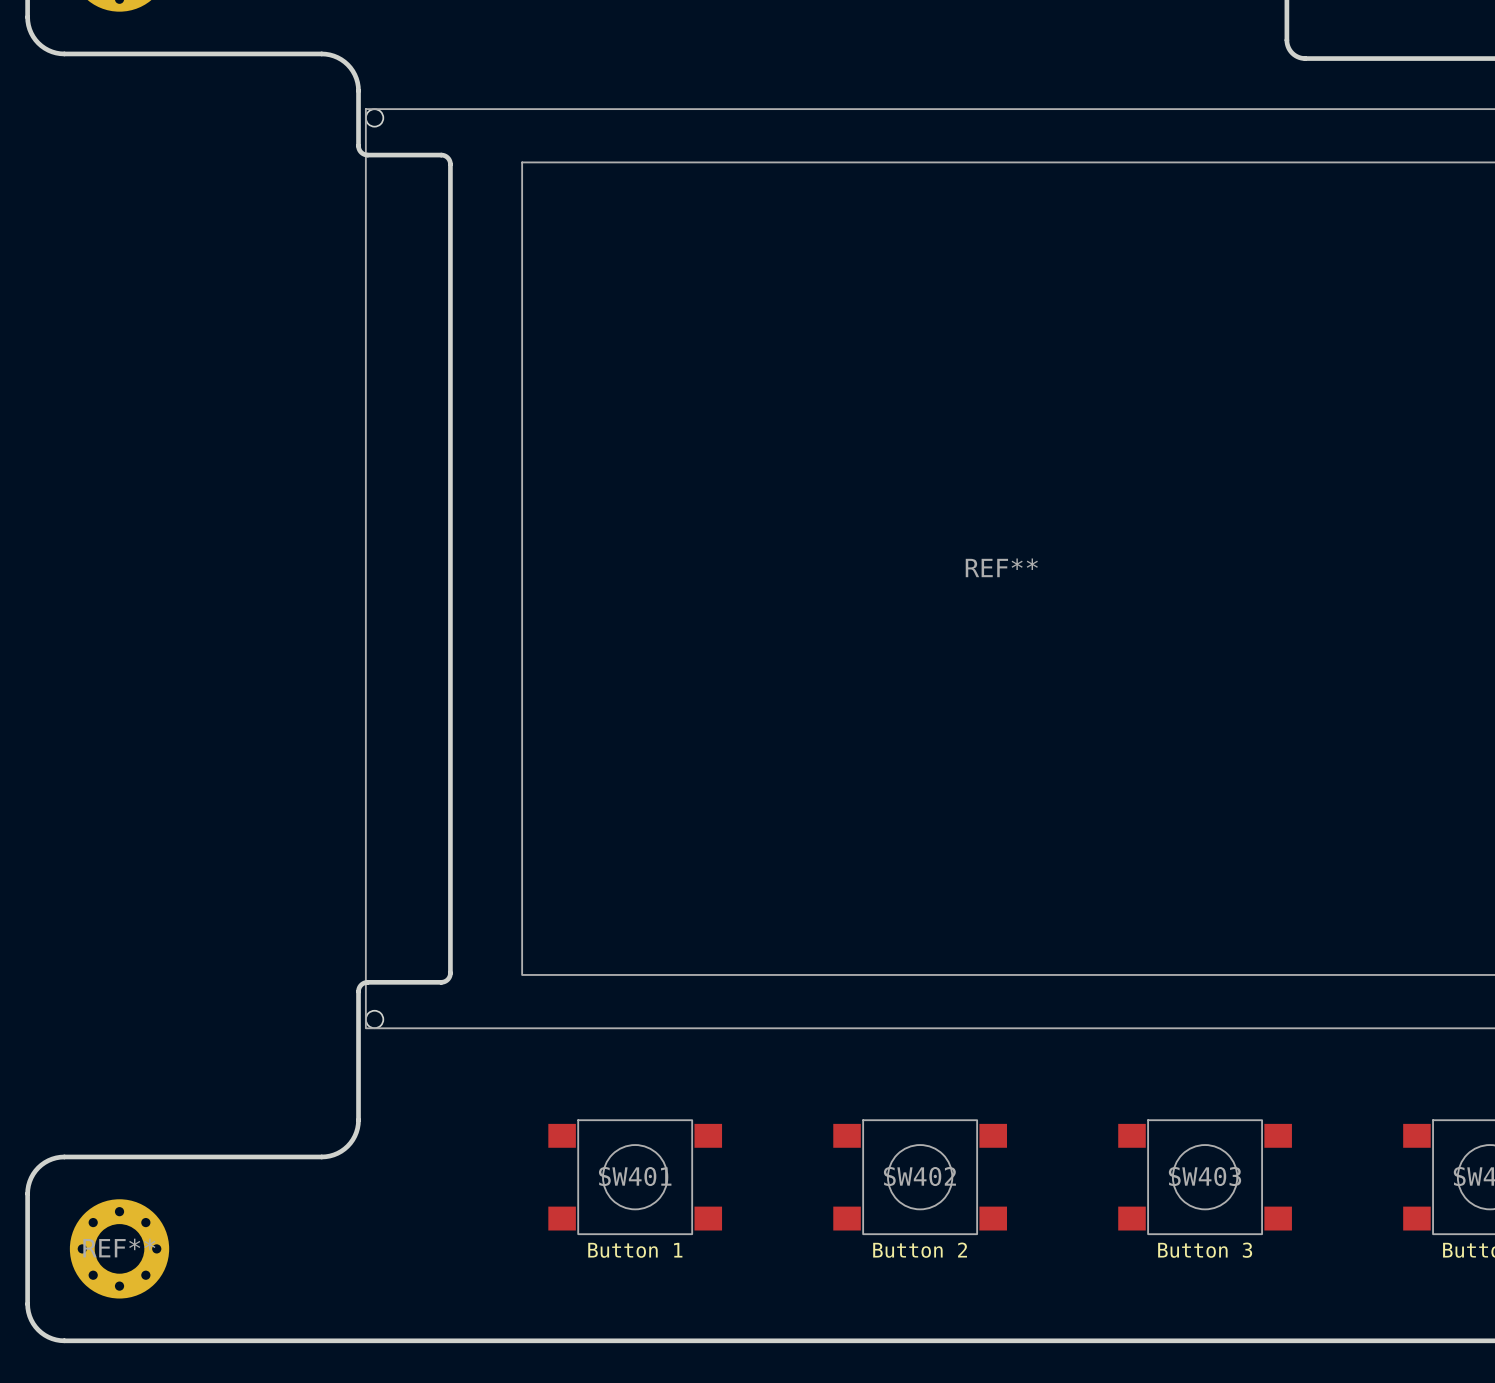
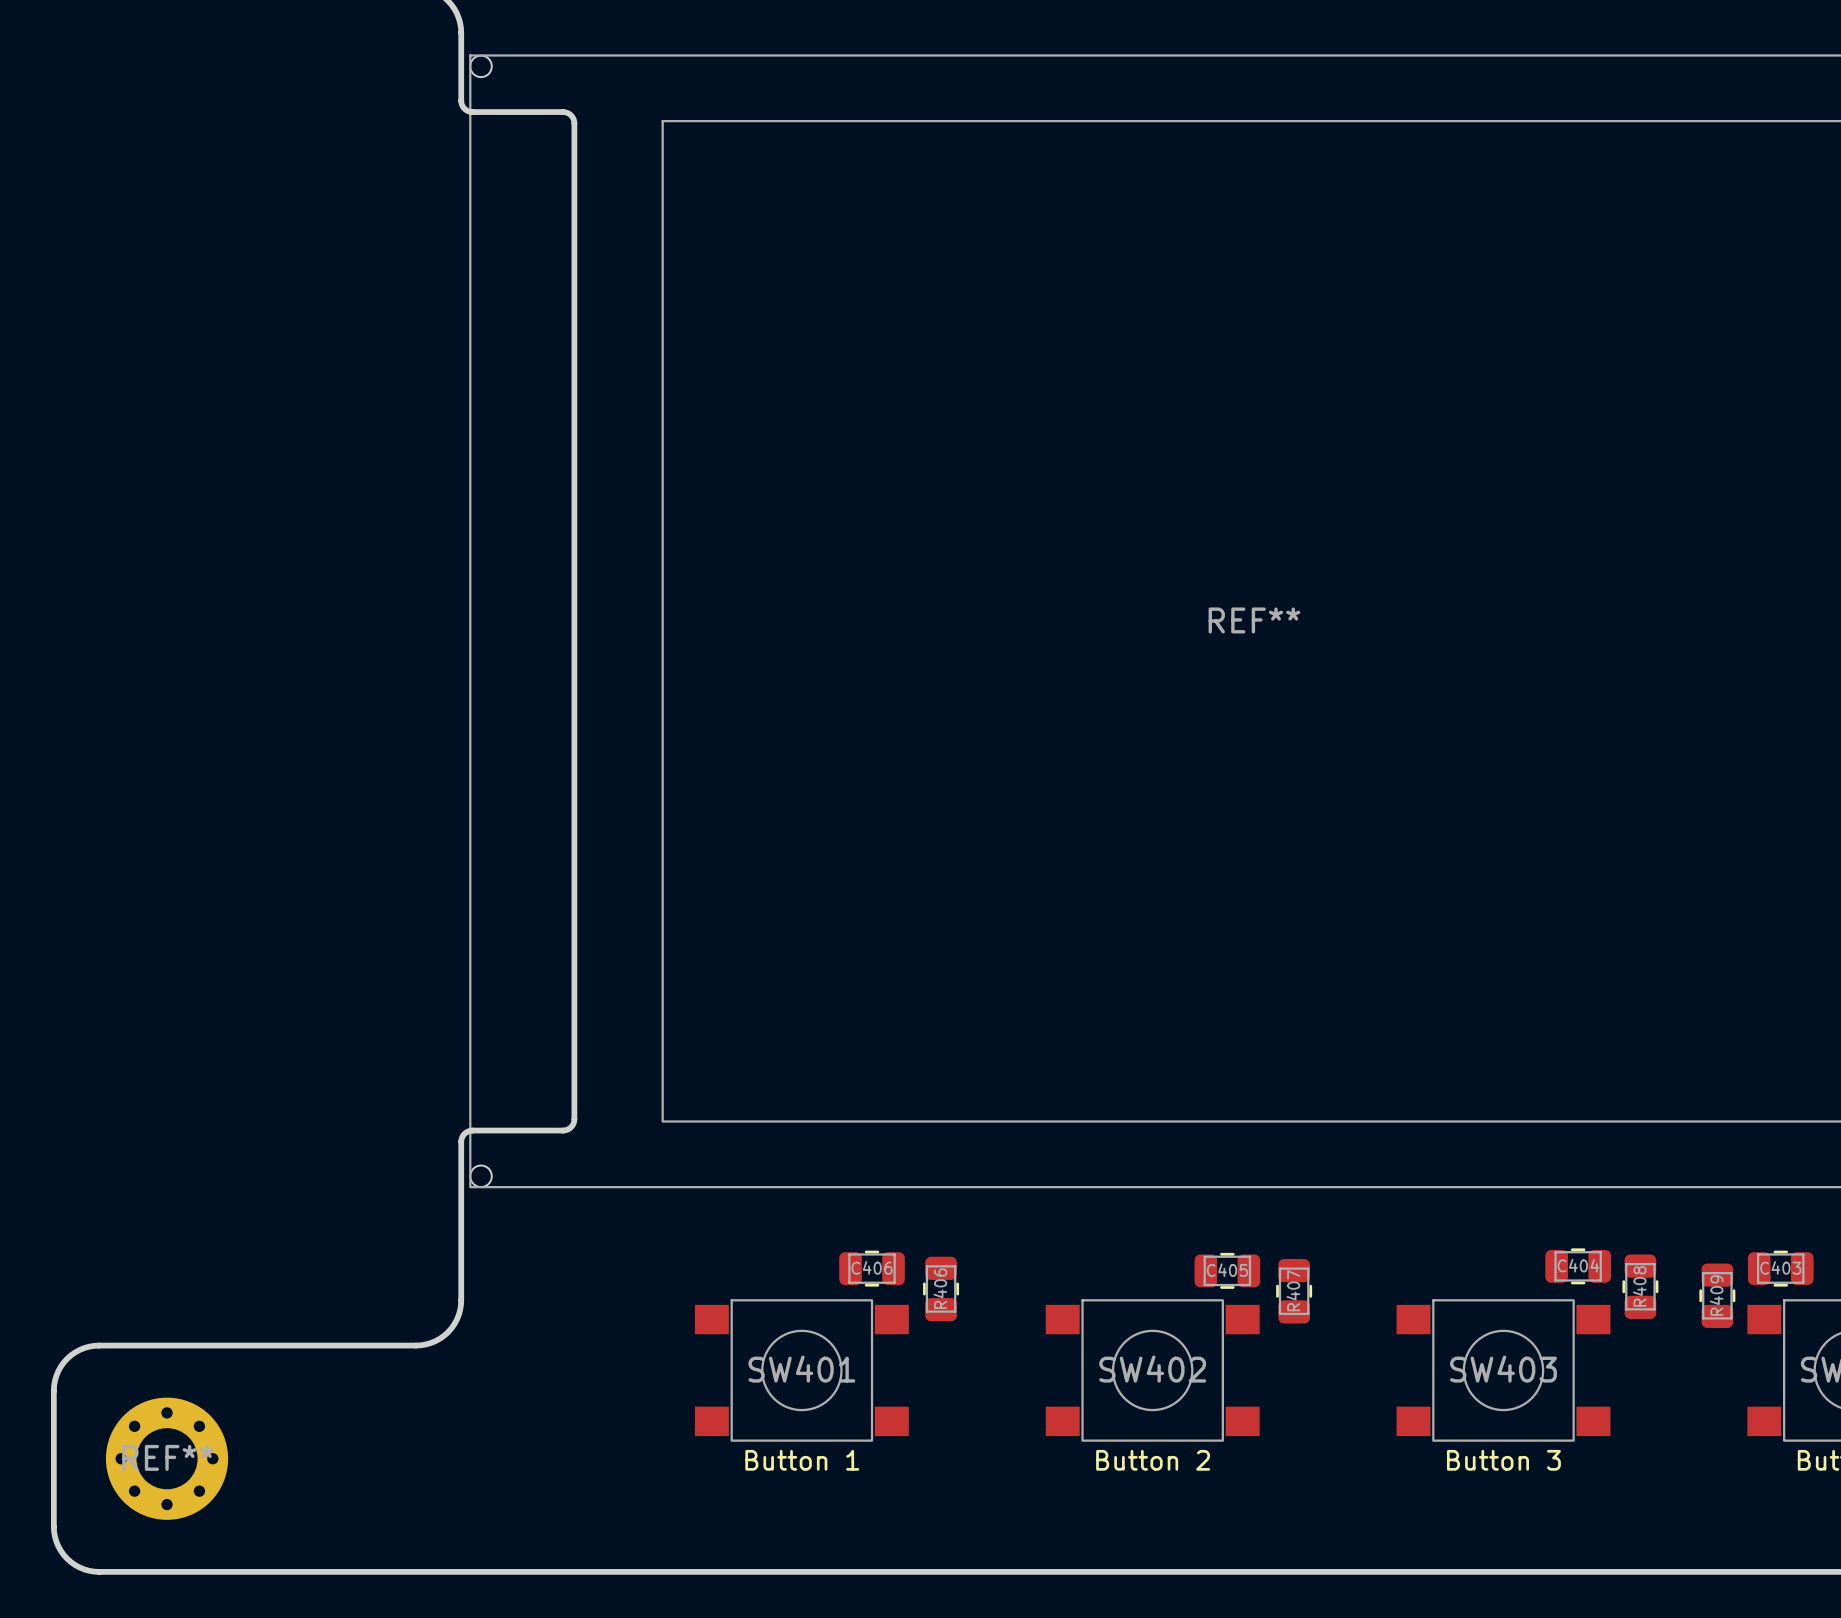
C404: none -> (1578, 1266)
C406: none -> (872, 1268)
C403: none -> (1780, 1268)
C405: none -> (1227, 1270)
R408: none -> (1640, 1286)
R406: none -> (941, 1288)
R407: none -> (1294, 1291)
R409: none -> (1717, 1295)

